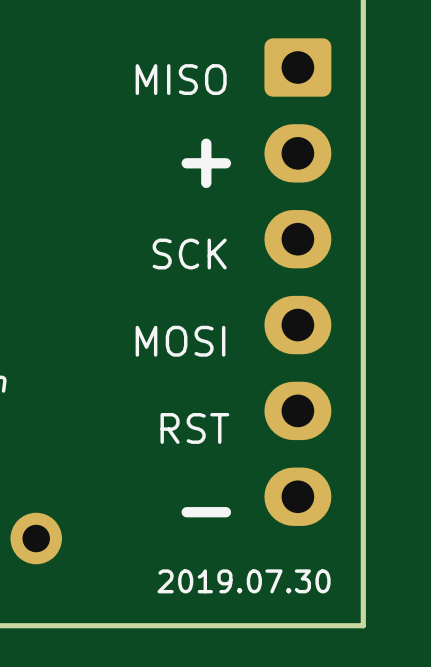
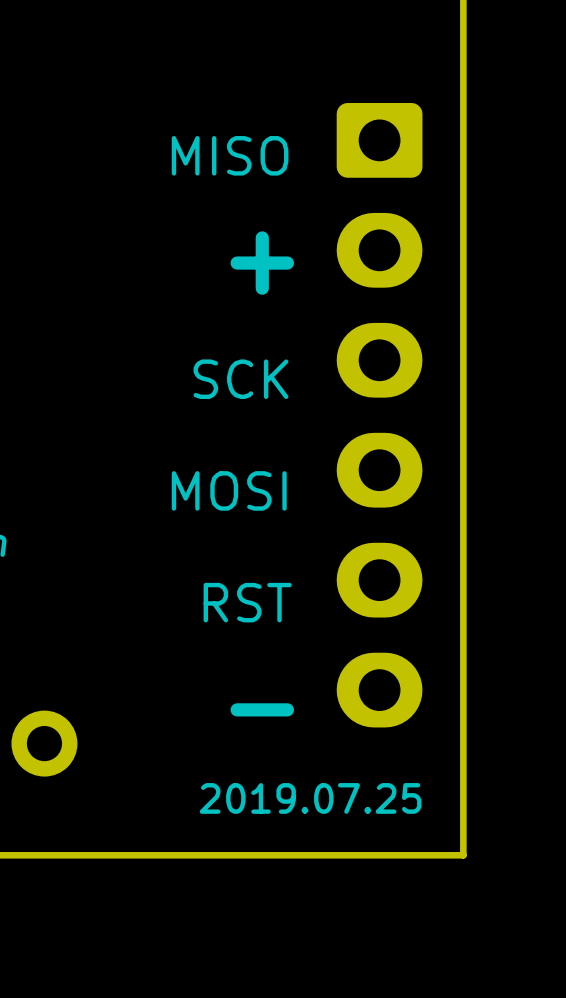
text: 2019.07.30 (244, 581) -> 2019.07.25 (310, 798)

